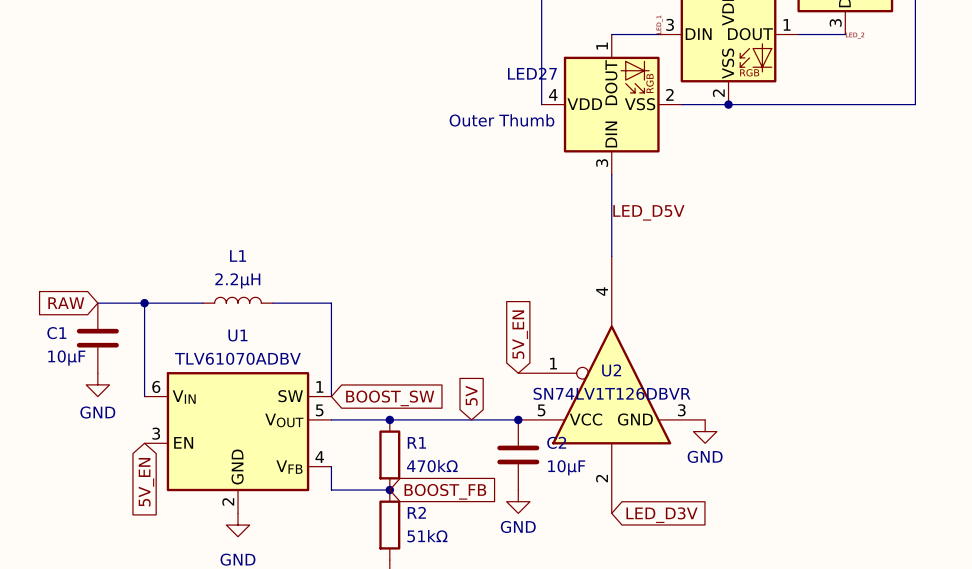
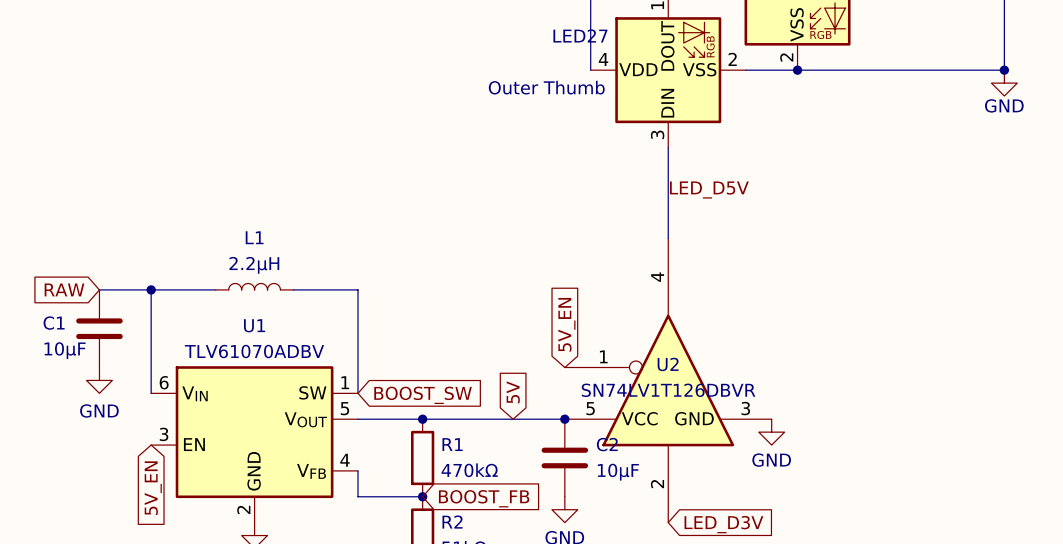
junction: none -> (1004, 70)
power symbol: none -> GND (1004, 83)

